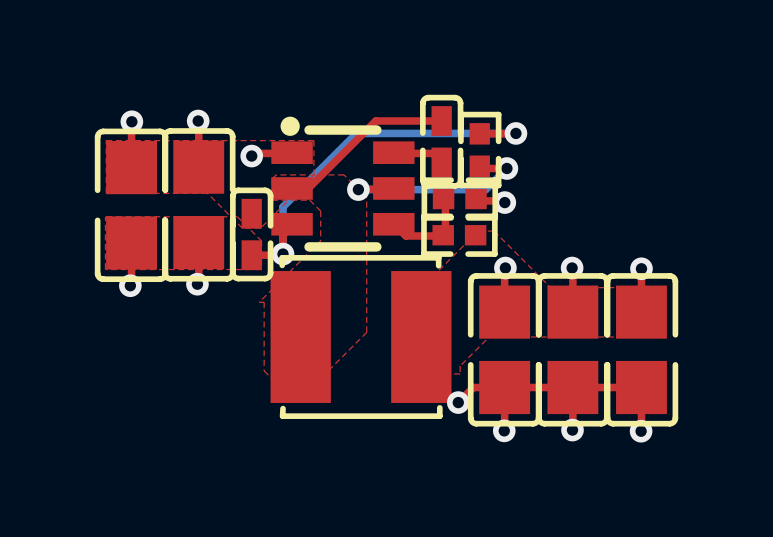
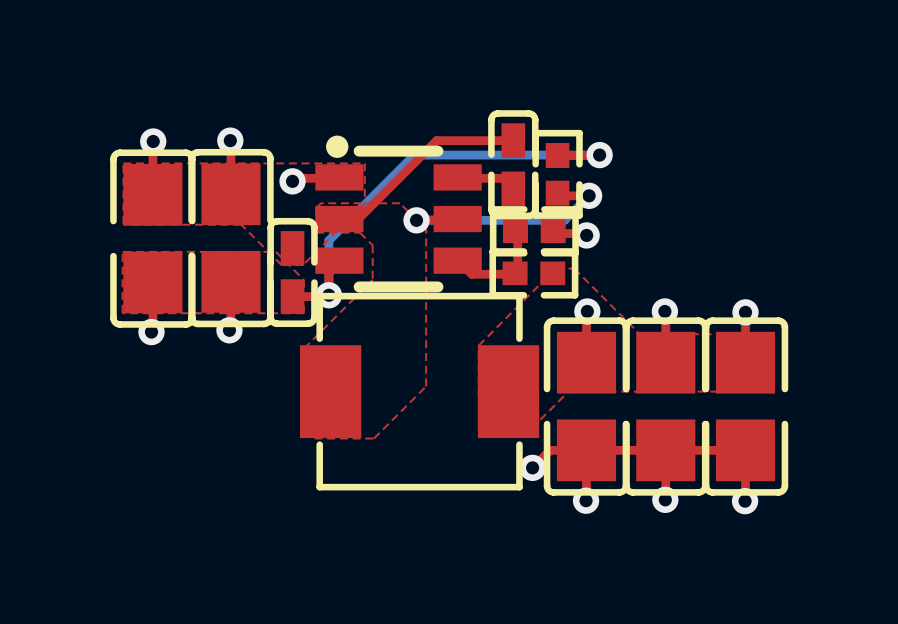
part footprint: [270, 255, 452, 419] -> [299, 292, 540, 491]

